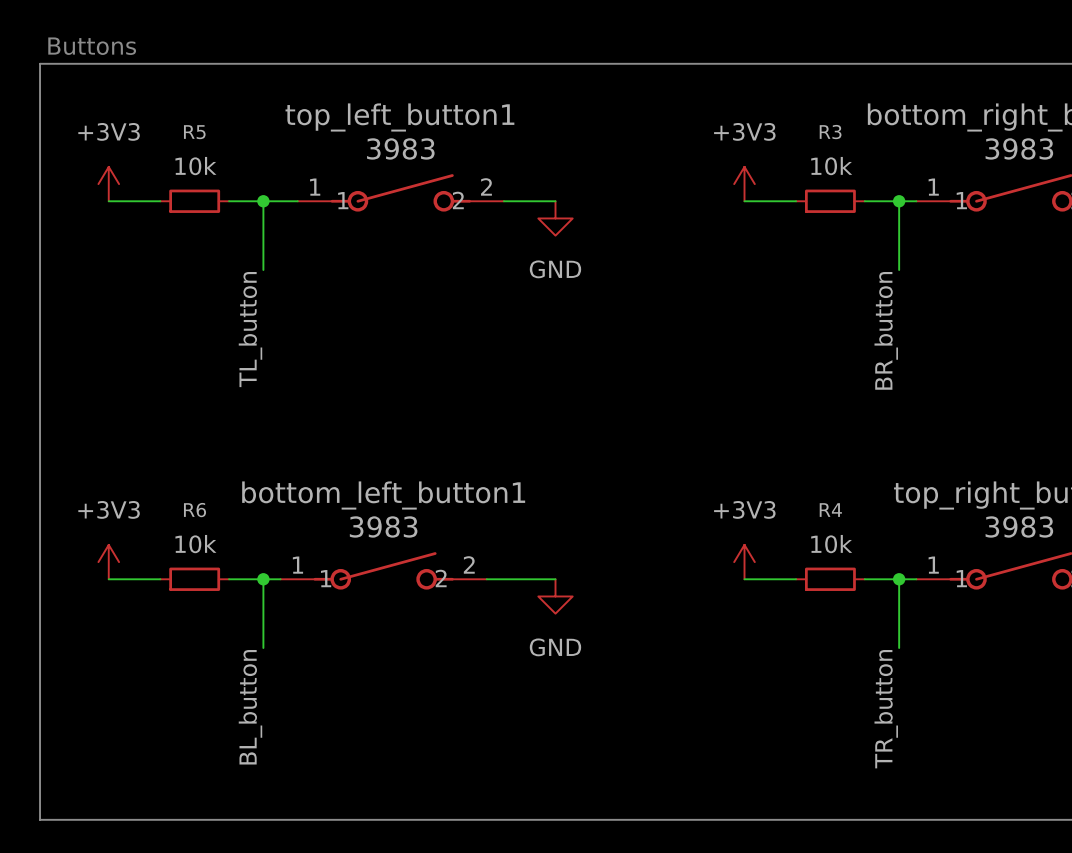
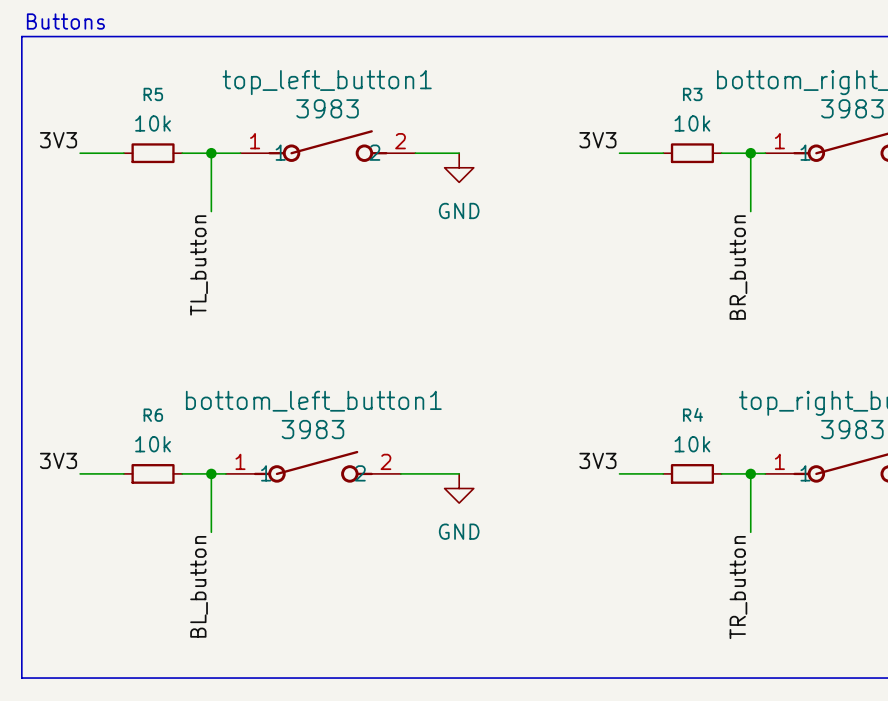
power symbol: +3V3 (108, 184) -> none
power symbol: +3V3 (744, 184) -> none
label: none -> 3V3 (58, 140)
label: none -> 3V3 (597, 140)
power symbol: +3V3 (108, 562) -> none
power symbol: +3V3 (744, 562) -> none
label: none -> 3V3 (58, 460)
label: none -> 3V3 (597, 460)

